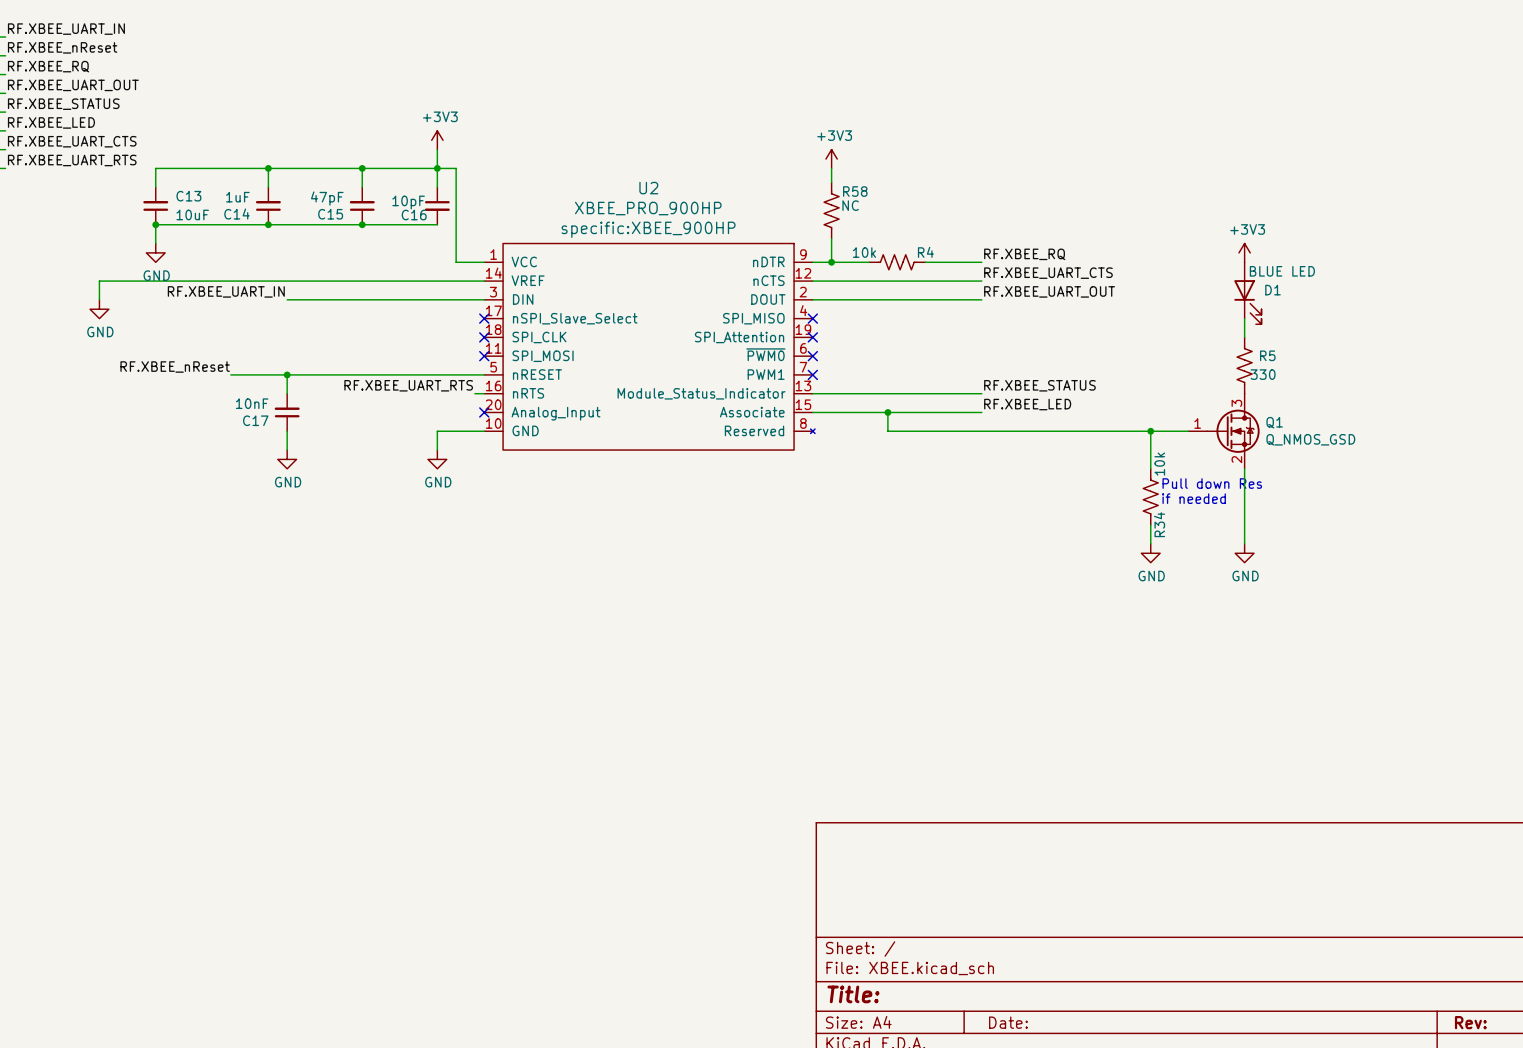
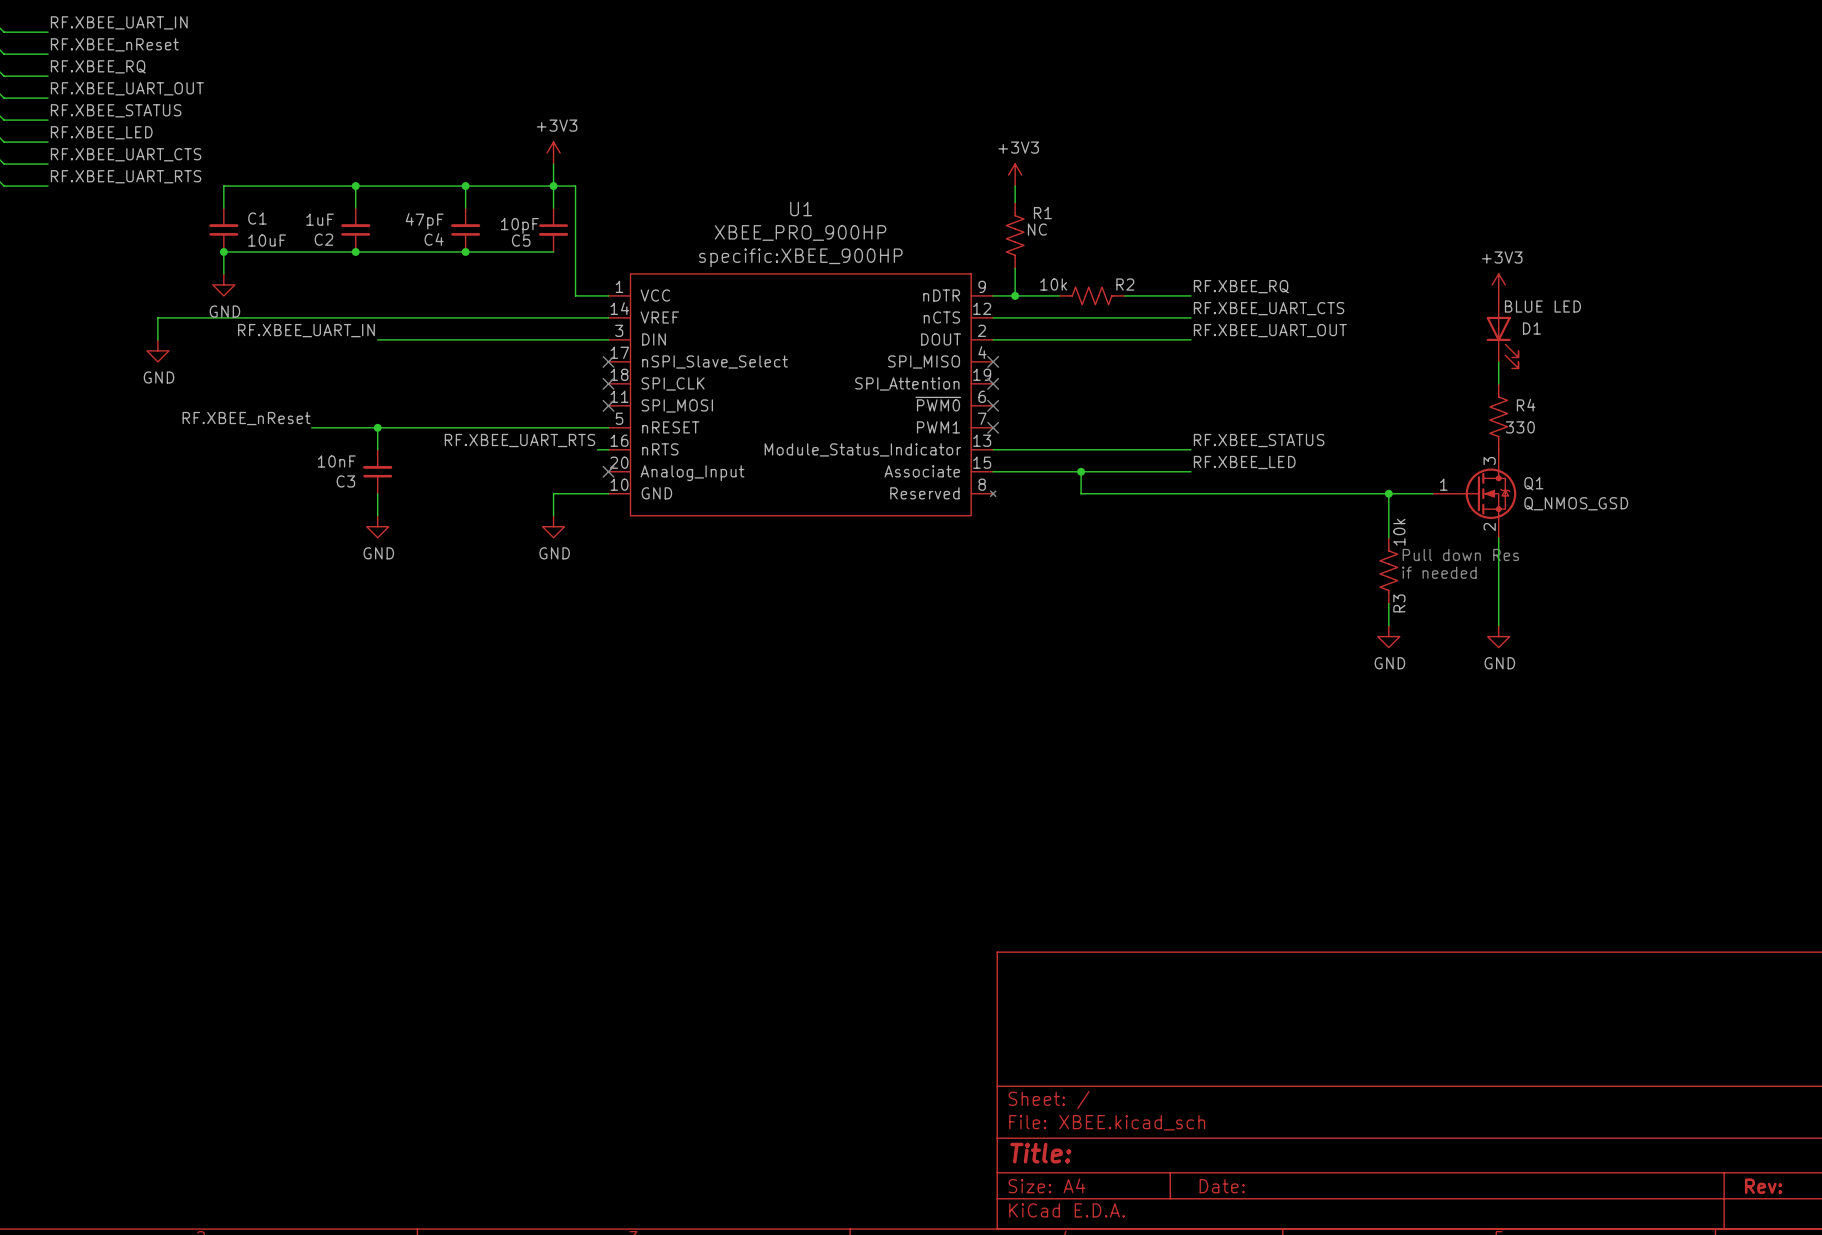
U2 name: U2 (648, 188) -> U1 (801, 209)
R58 name: R58 (855, 191) -> R1 (1042, 213)
C13 name: C13 (188, 196) -> C1 (257, 218)
C14 name: C14 (236, 214) -> C2 (323, 239)
C15 name: C15 (330, 214) -> C4 (434, 239)
C16 name: C16 (414, 215) -> C5 (521, 240)
R4 name: R4 (925, 252) -> R2 (1125, 284)
R5 name: R5 (1267, 355) -> R4 (1526, 405)
C17 name: C17 (255, 420) -> C3 (345, 481)
R34 name: R34 (1159, 524) -> R3 (1399, 603)

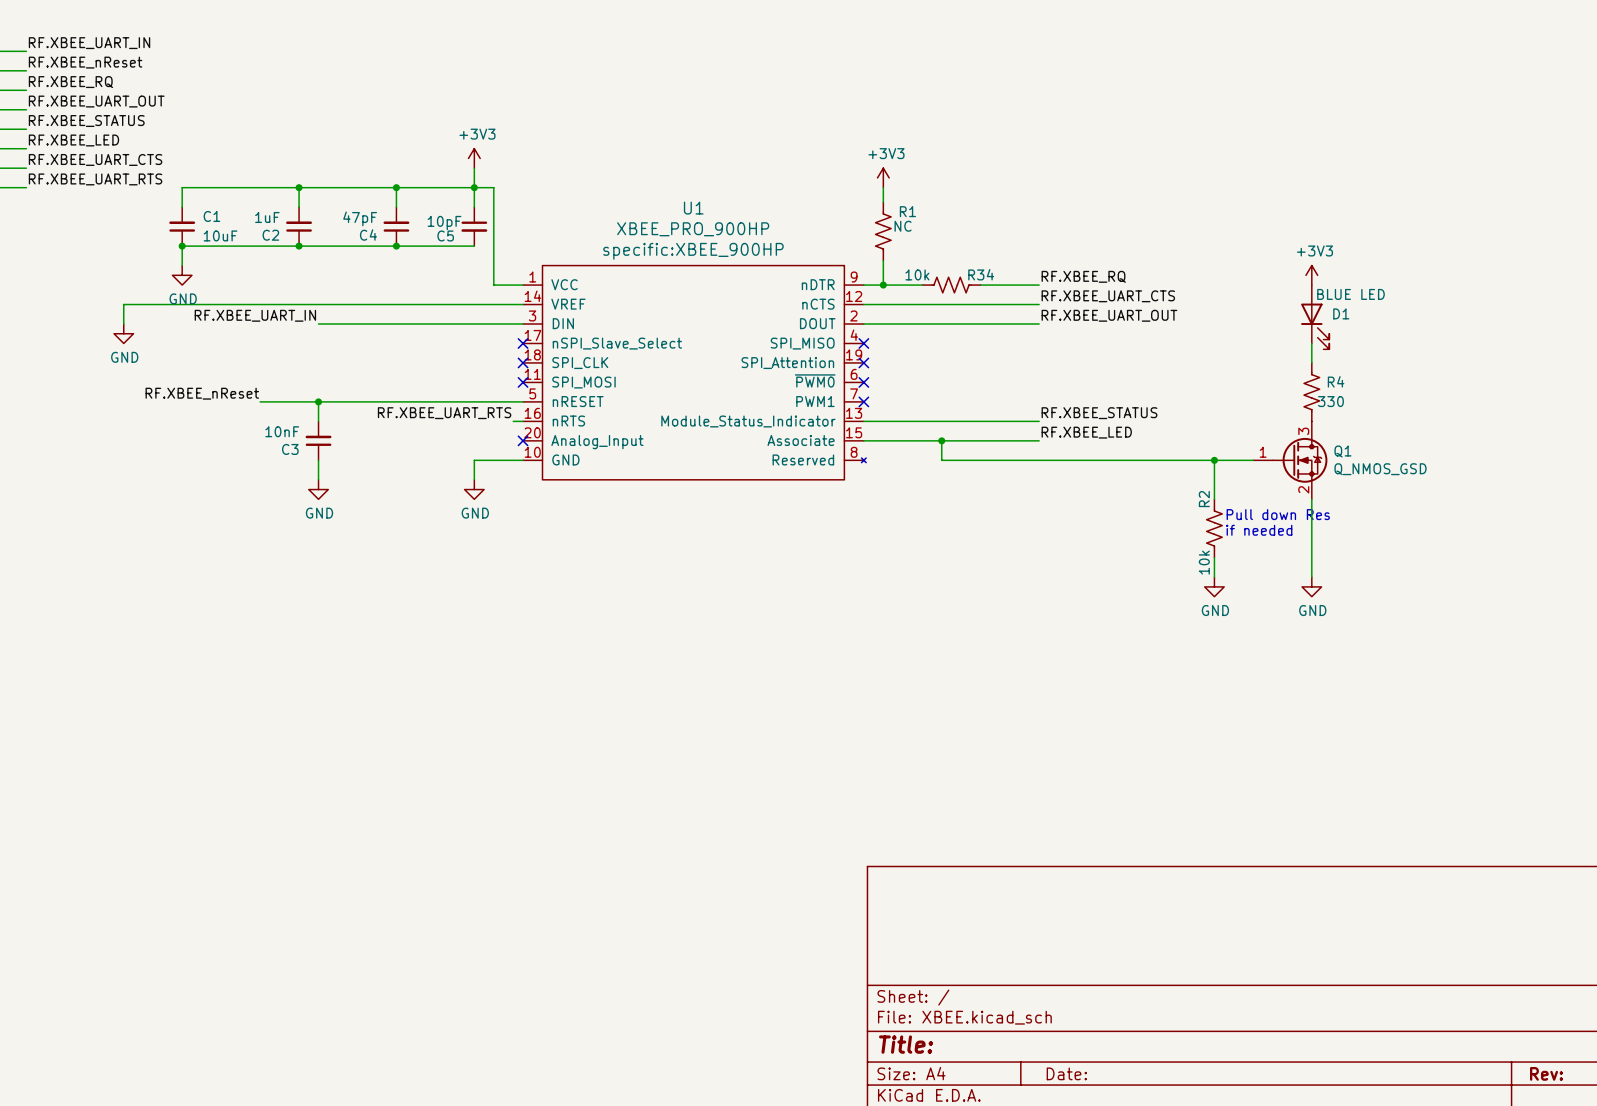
R2 name: R2 (1125, 284) -> R34 (981, 274)
R3 value position: 10k (1399, 532) -> 10k (1204, 562)
R3 name: R3 (1399, 603) -> R2 (1204, 499)

